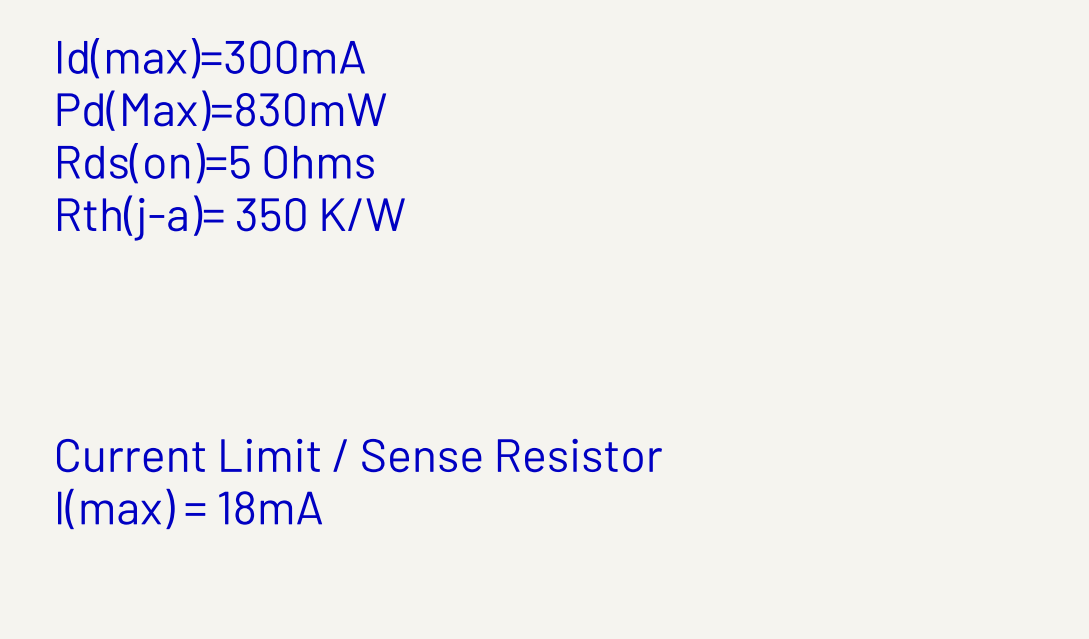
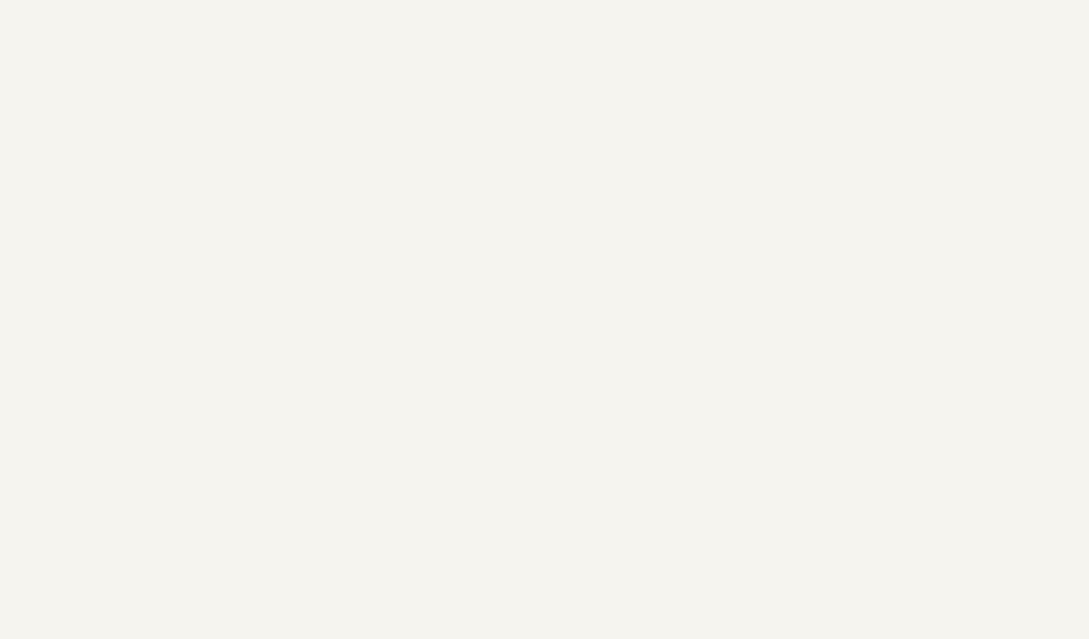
text: Id(max)=300mA (211, 58) -> none
text: Pd(Max)=830mW (221, 110) -> none
text: Rds(on)=5 Ohms (215, 163) -> none
text: Rth(j-a)= 350 K/W (231, 218) -> none
text: Current Limit / Sense Resistor (359, 455) -> none
text: I(max) = 18mA (190, 508) -> none

